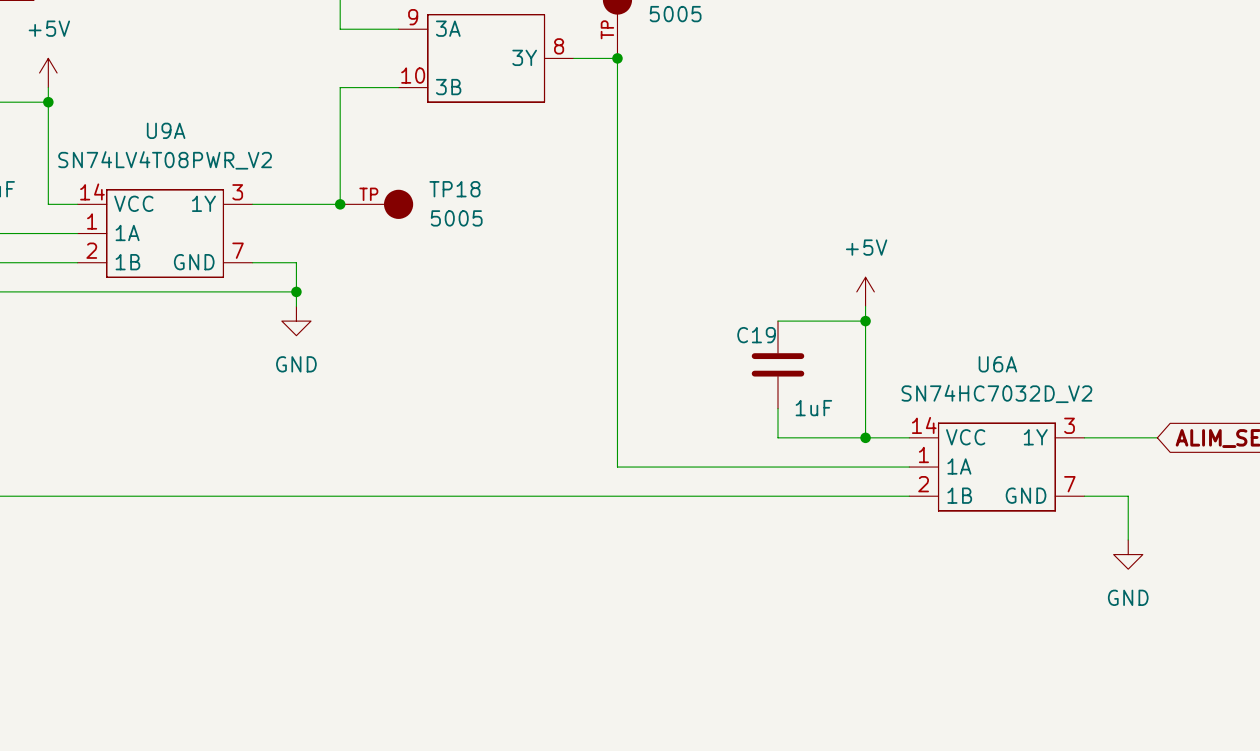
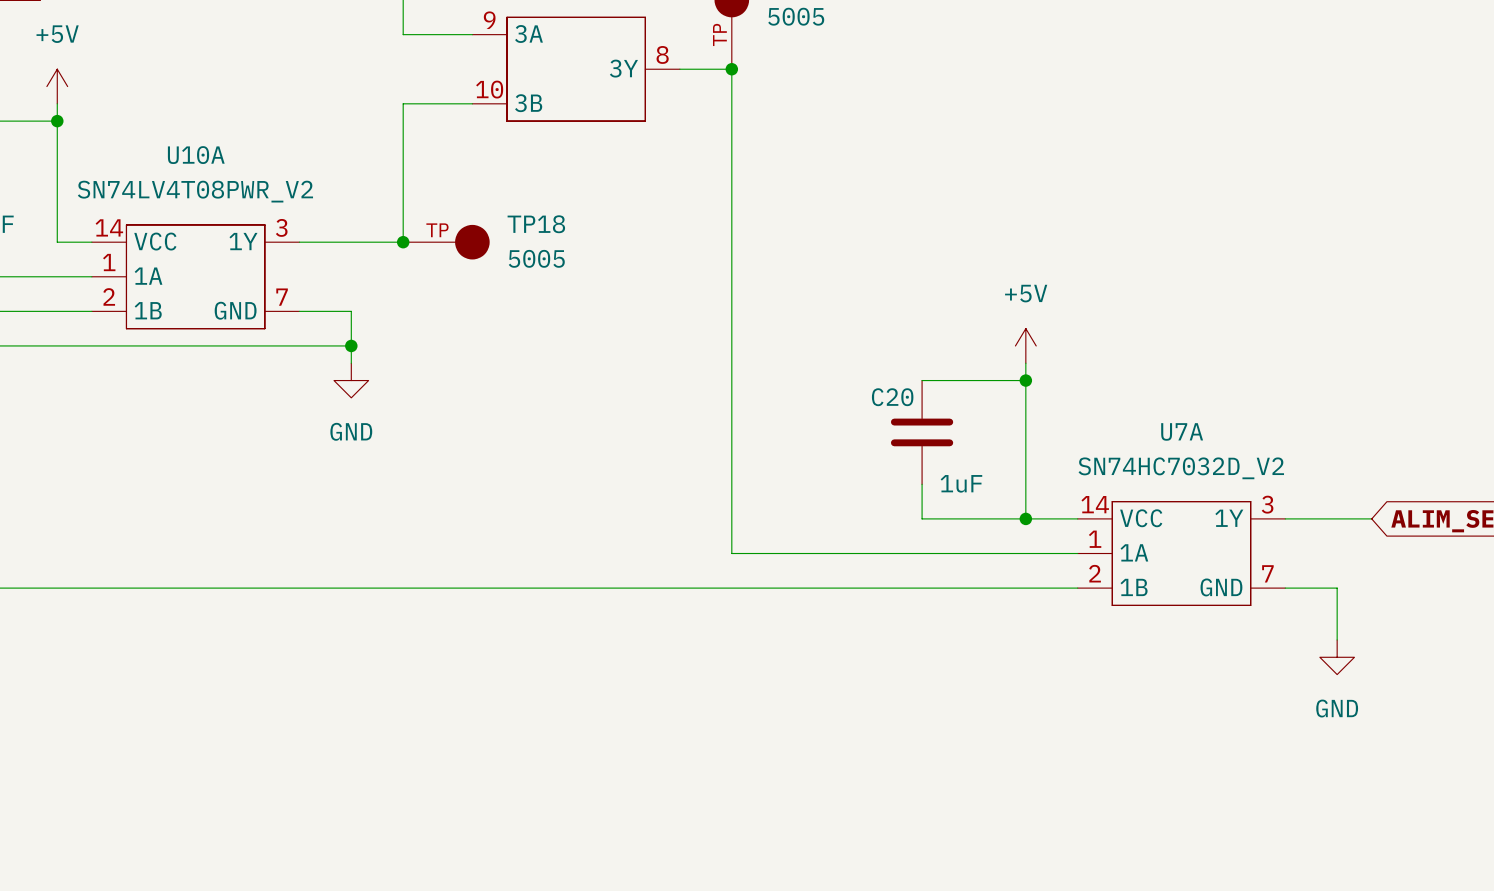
U9A name: U9A (166, 130) -> U10A (196, 155)
C19 name: C19 (756, 335) -> C20 (892, 397)
U6A name: U6A (997, 364) -> U7A (1182, 431)

